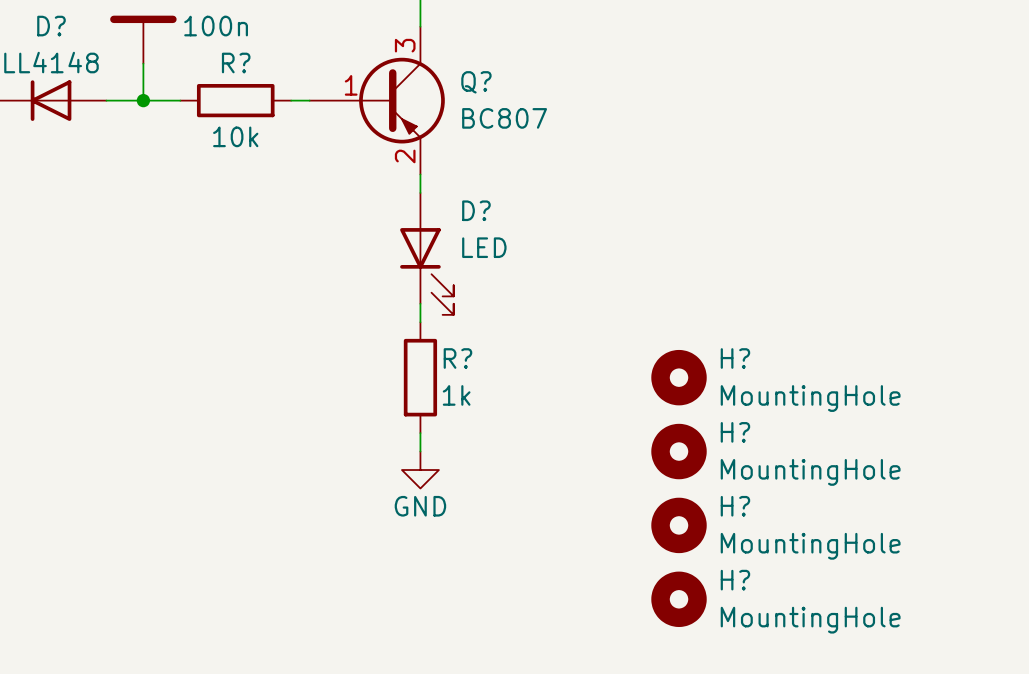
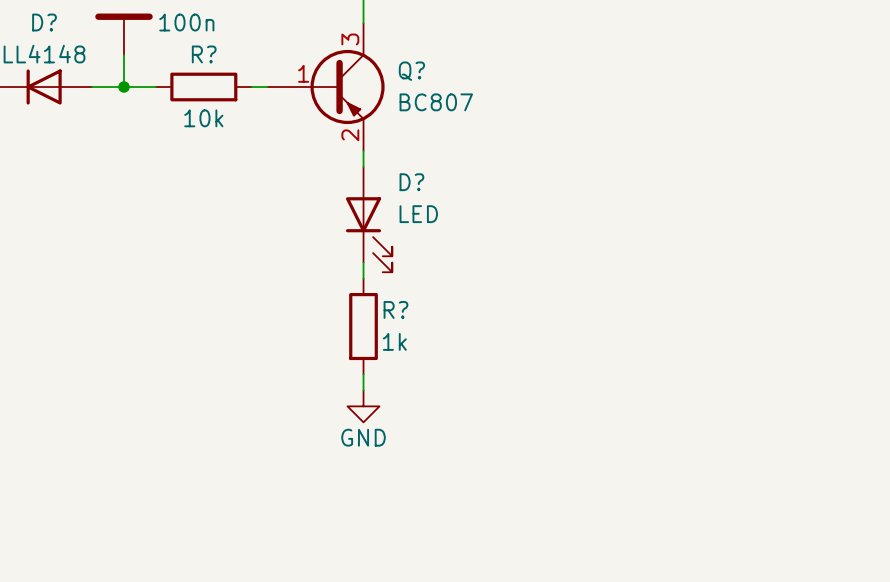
H?: MountingHole (679, 377) -> none
H?: MountingHole (679, 451) -> none
H?: MountingHole (679, 525) -> none
H?: MountingHole (679, 599) -> none

